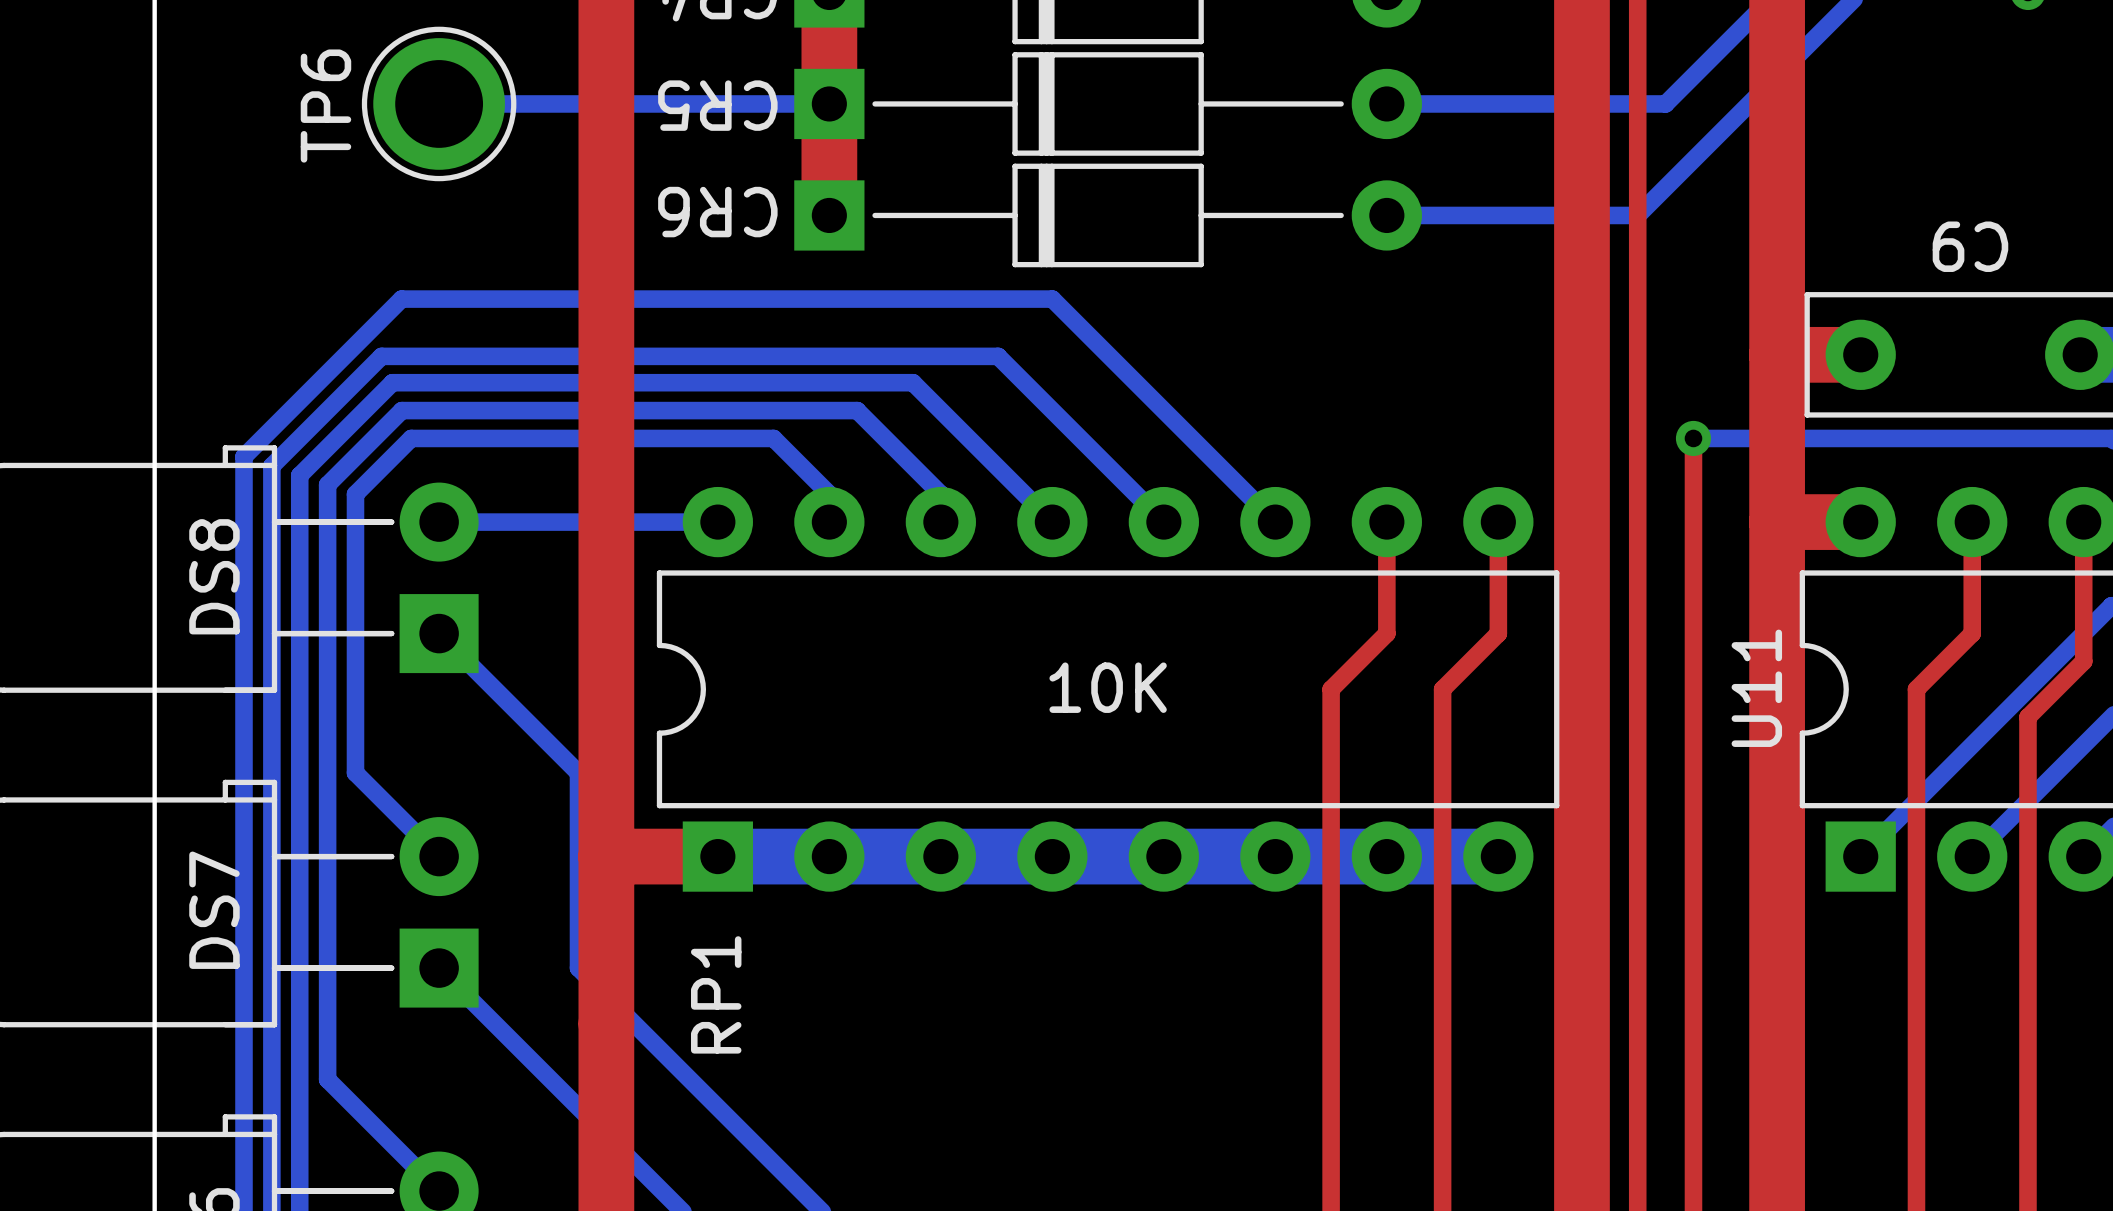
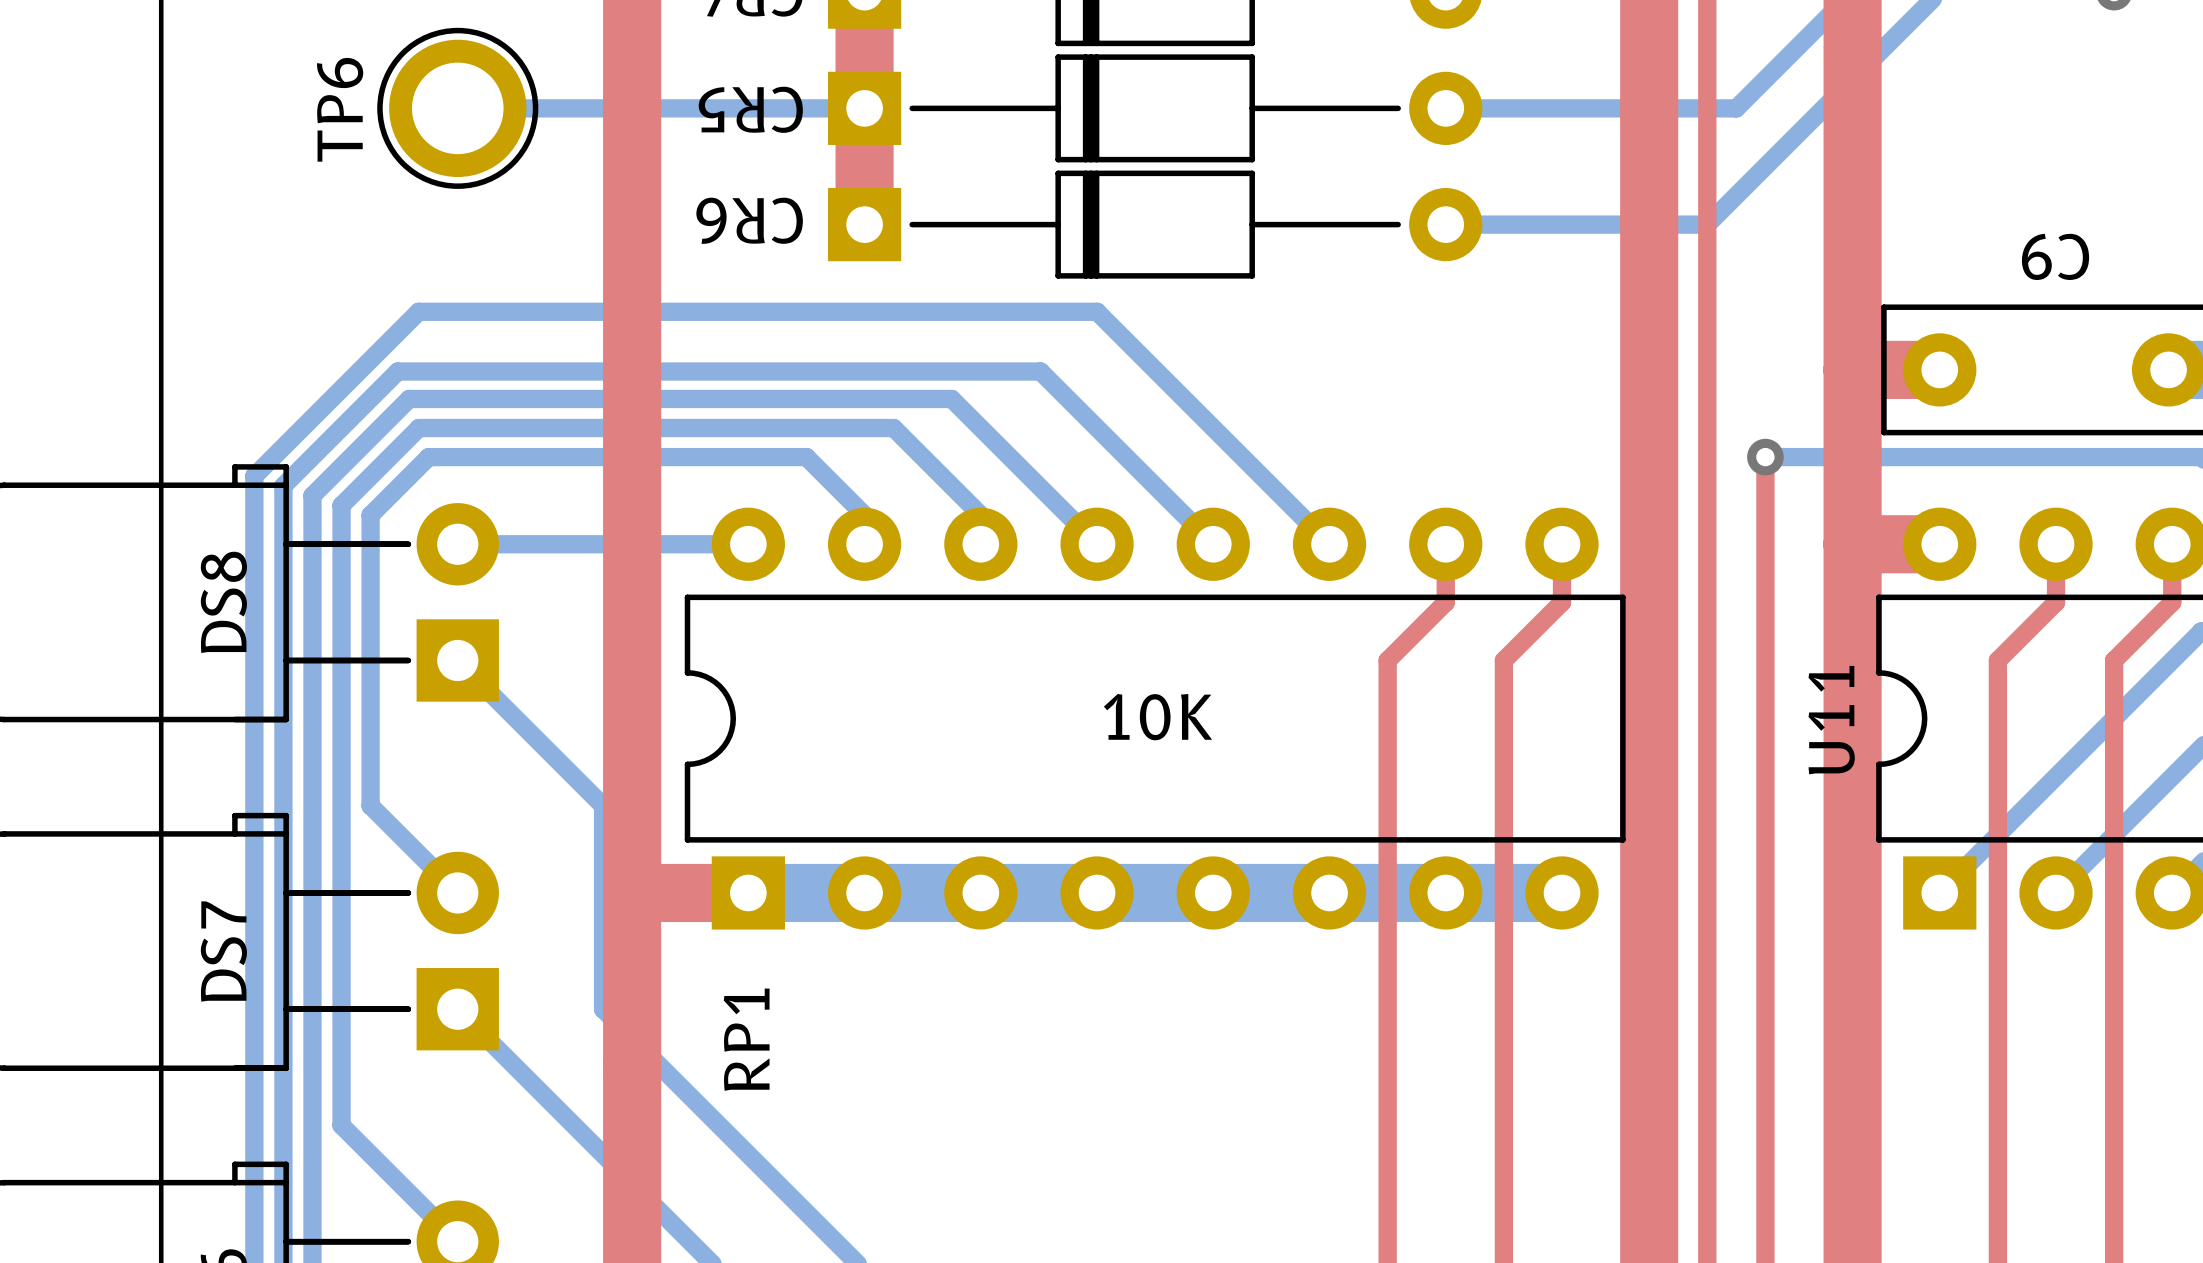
top track: (1386, 577) (1386, 633) (1331, 689) -> (1445, 602) (1387, 660) (1387, 718)
top track: (1498, 577) (1498, 633) (1442, 689) -> (1562, 602) (1503, 660) (1503, 718)
top track: (1972, 577) (1972, 633) (1916, 689) -> (2056, 602) (1997, 660) (1997, 718)
top track: (2083, 577) (2083, 661) (2027, 717) -> (2172, 602) (2114, 660) (2114, 747)

